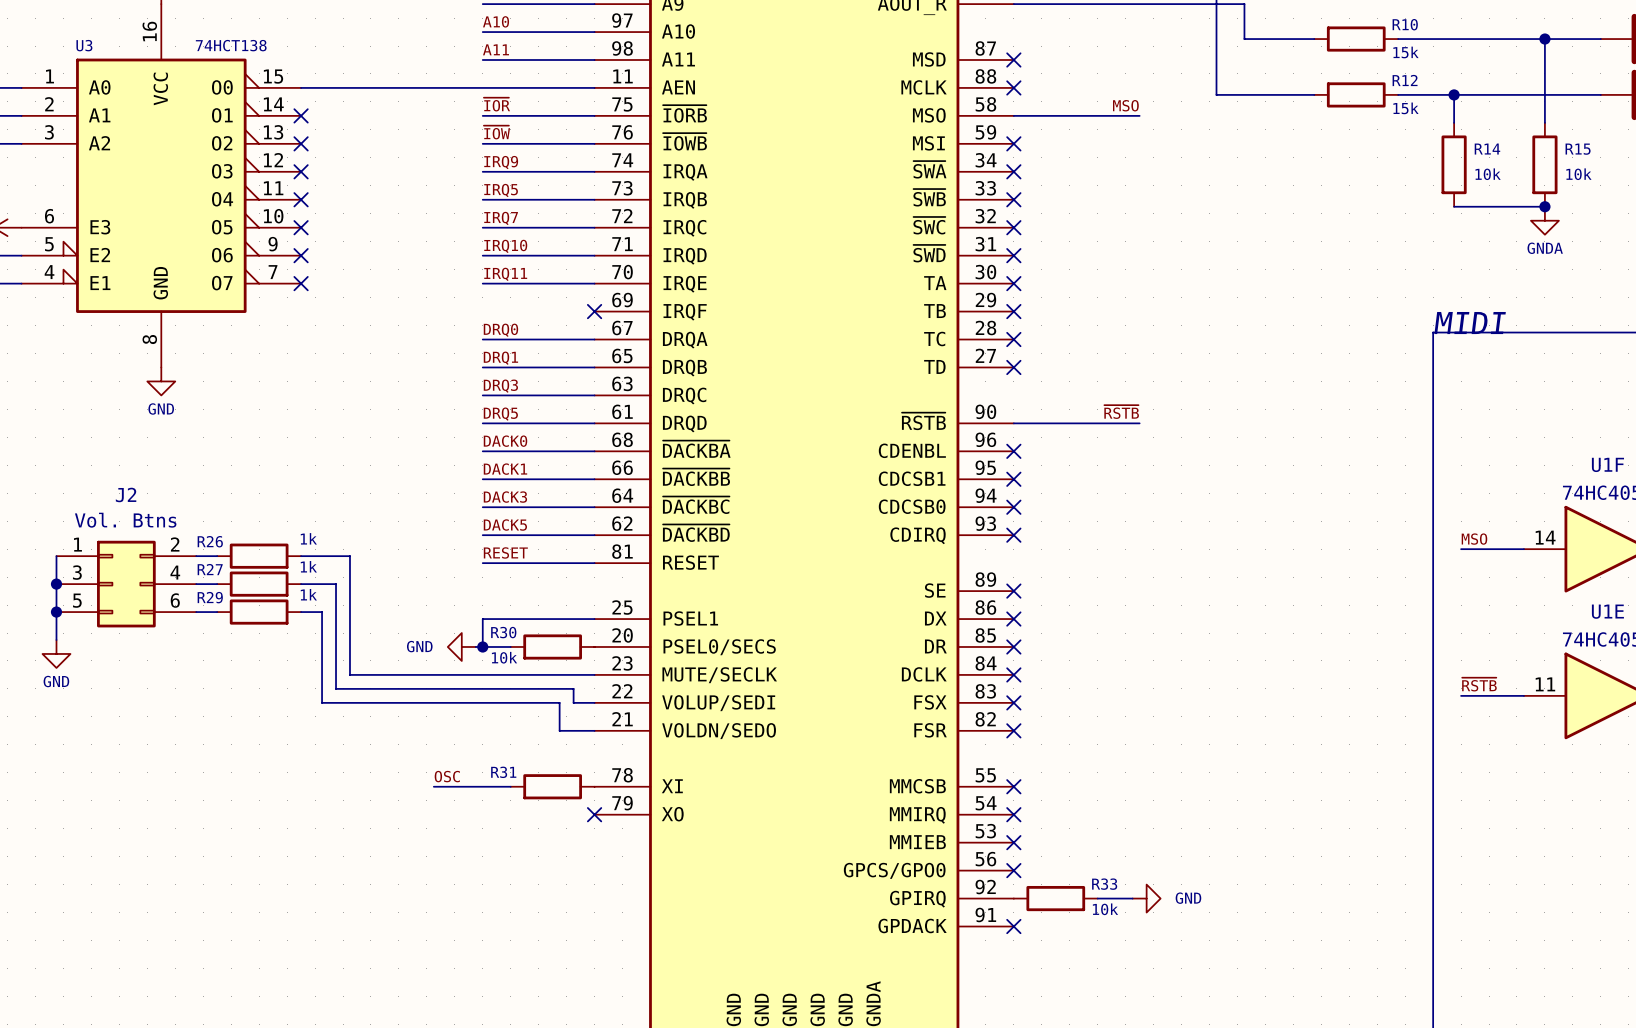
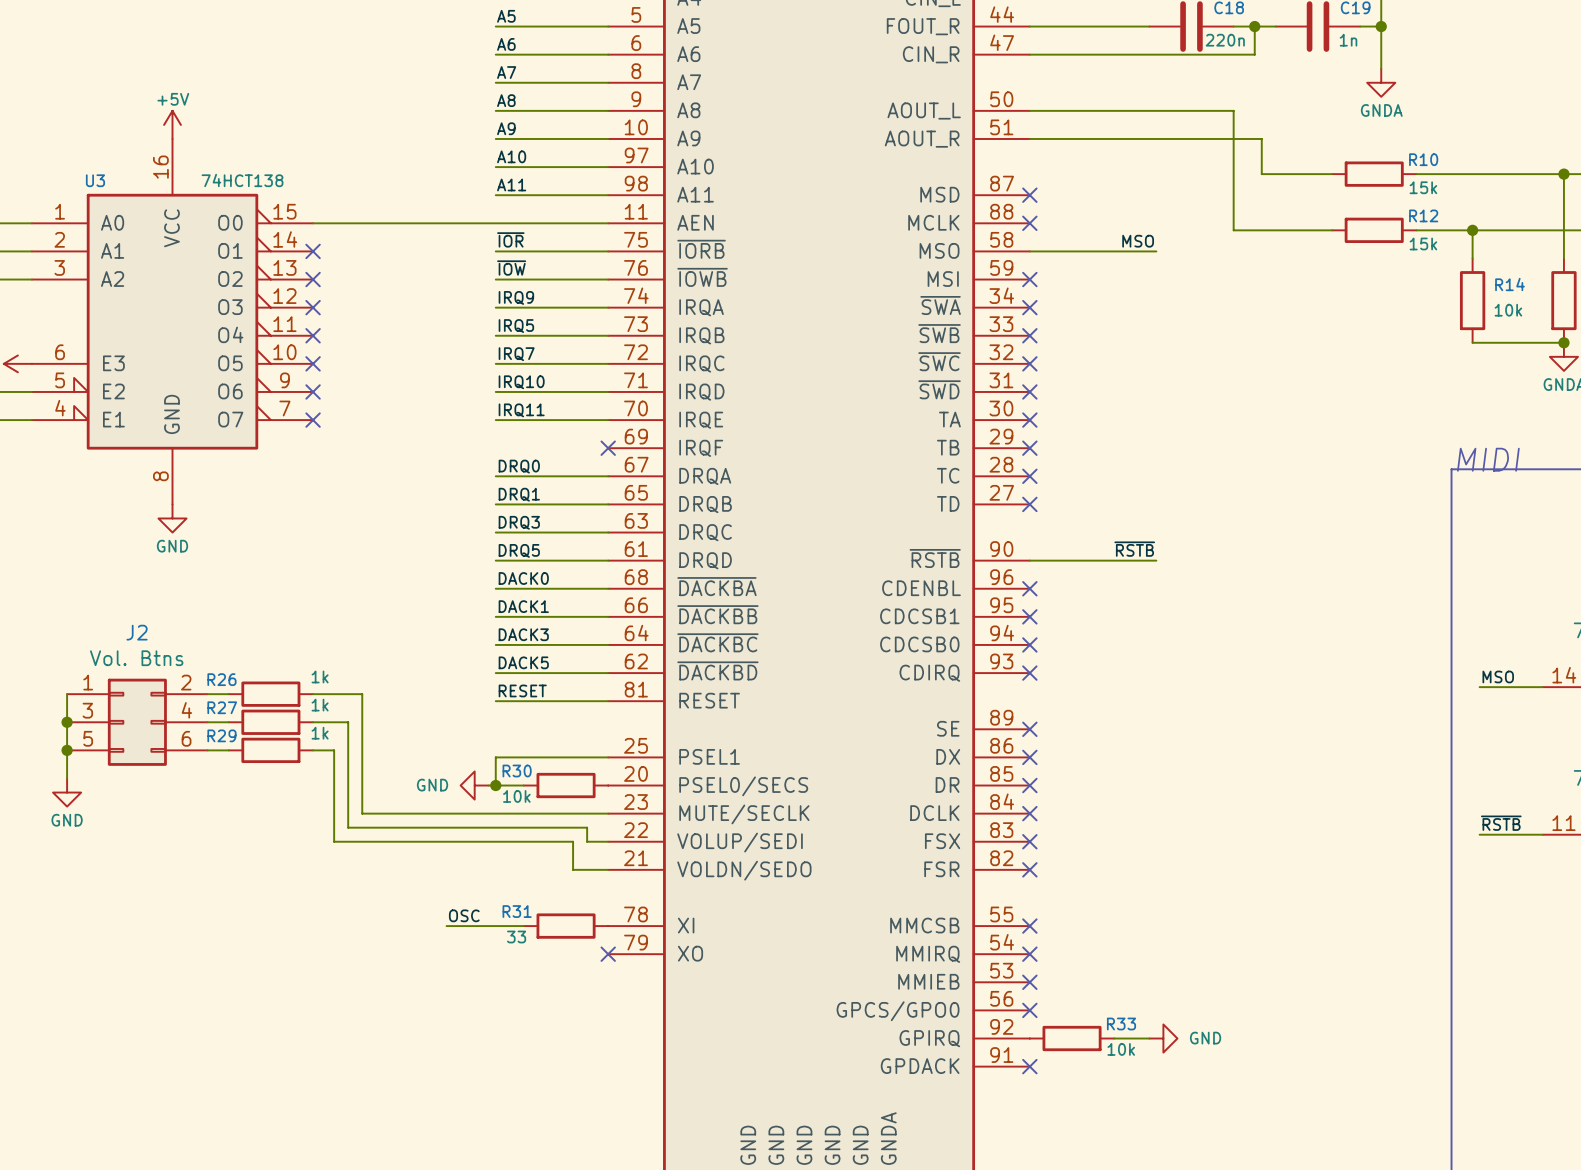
R31 value: none -> 33 (516, 936)

